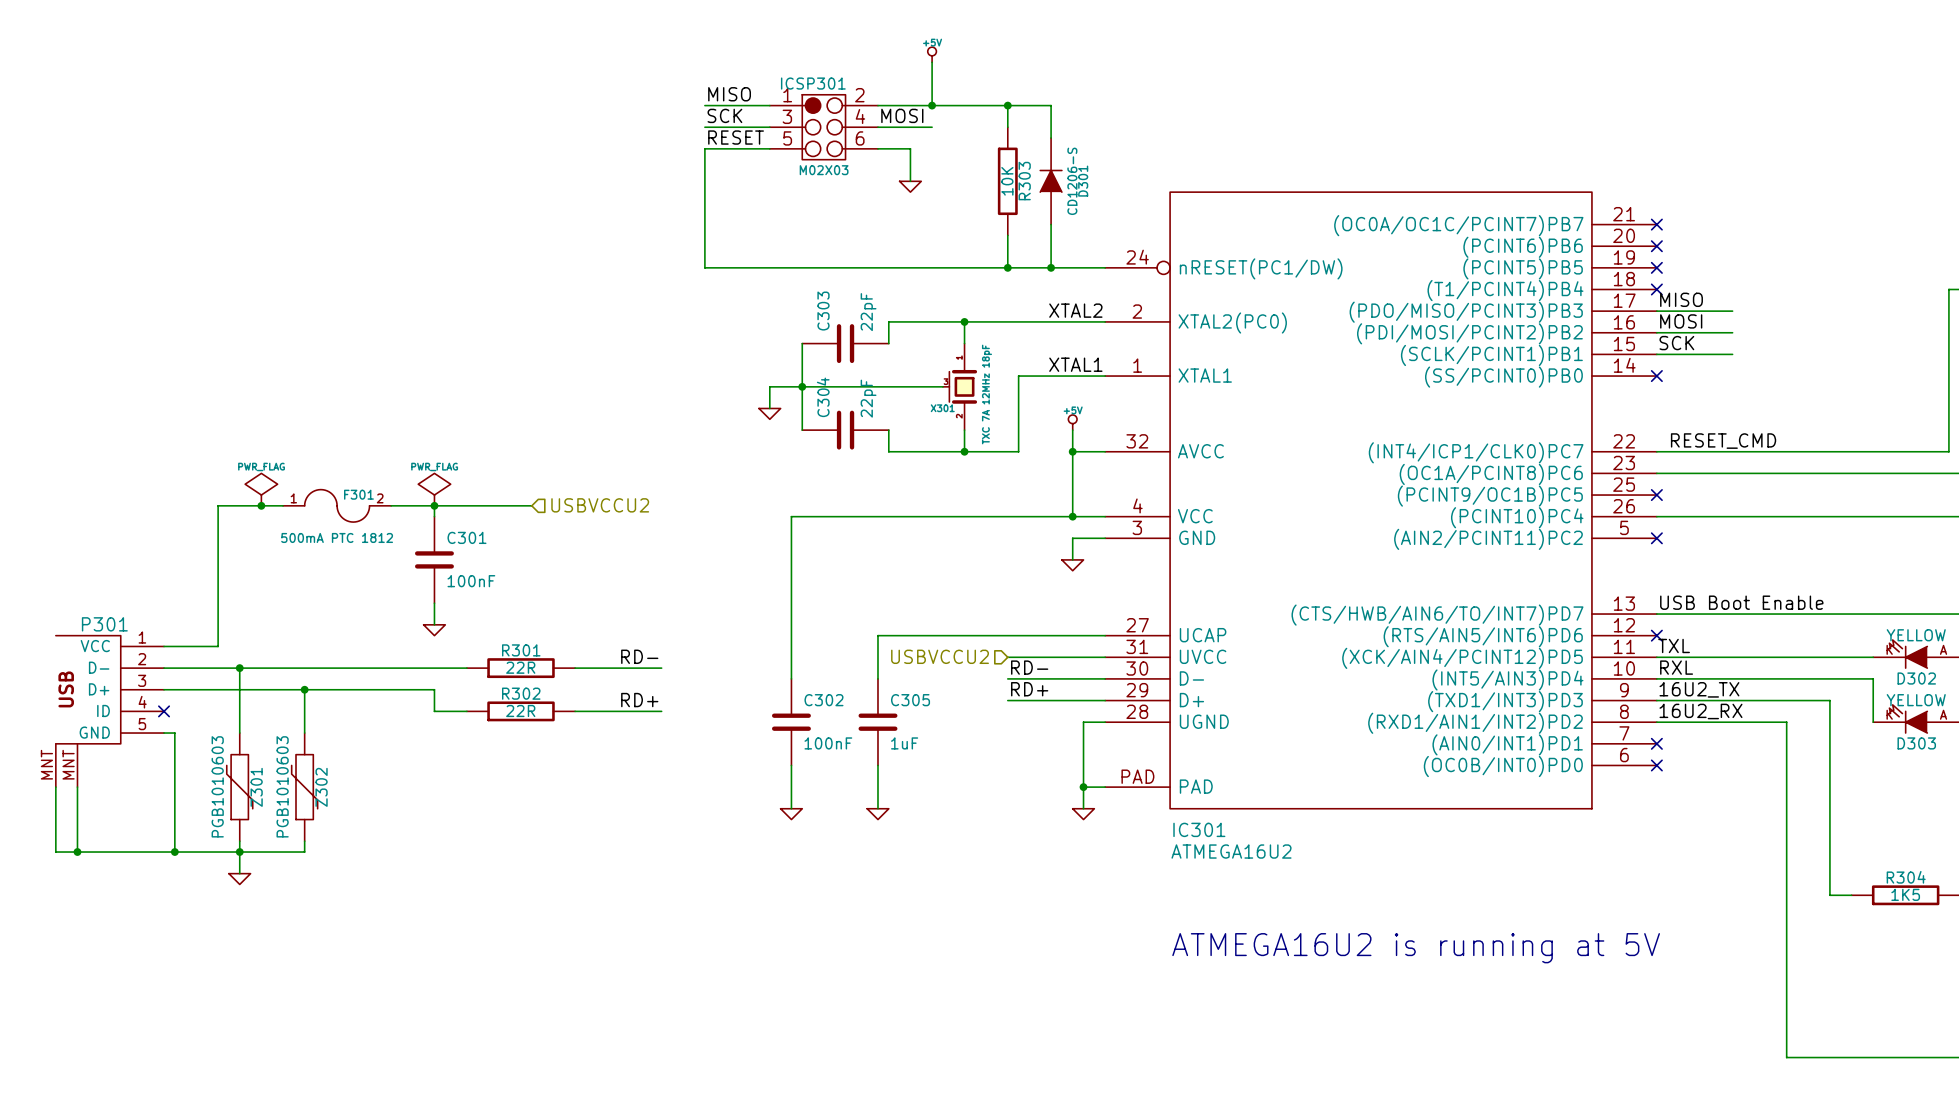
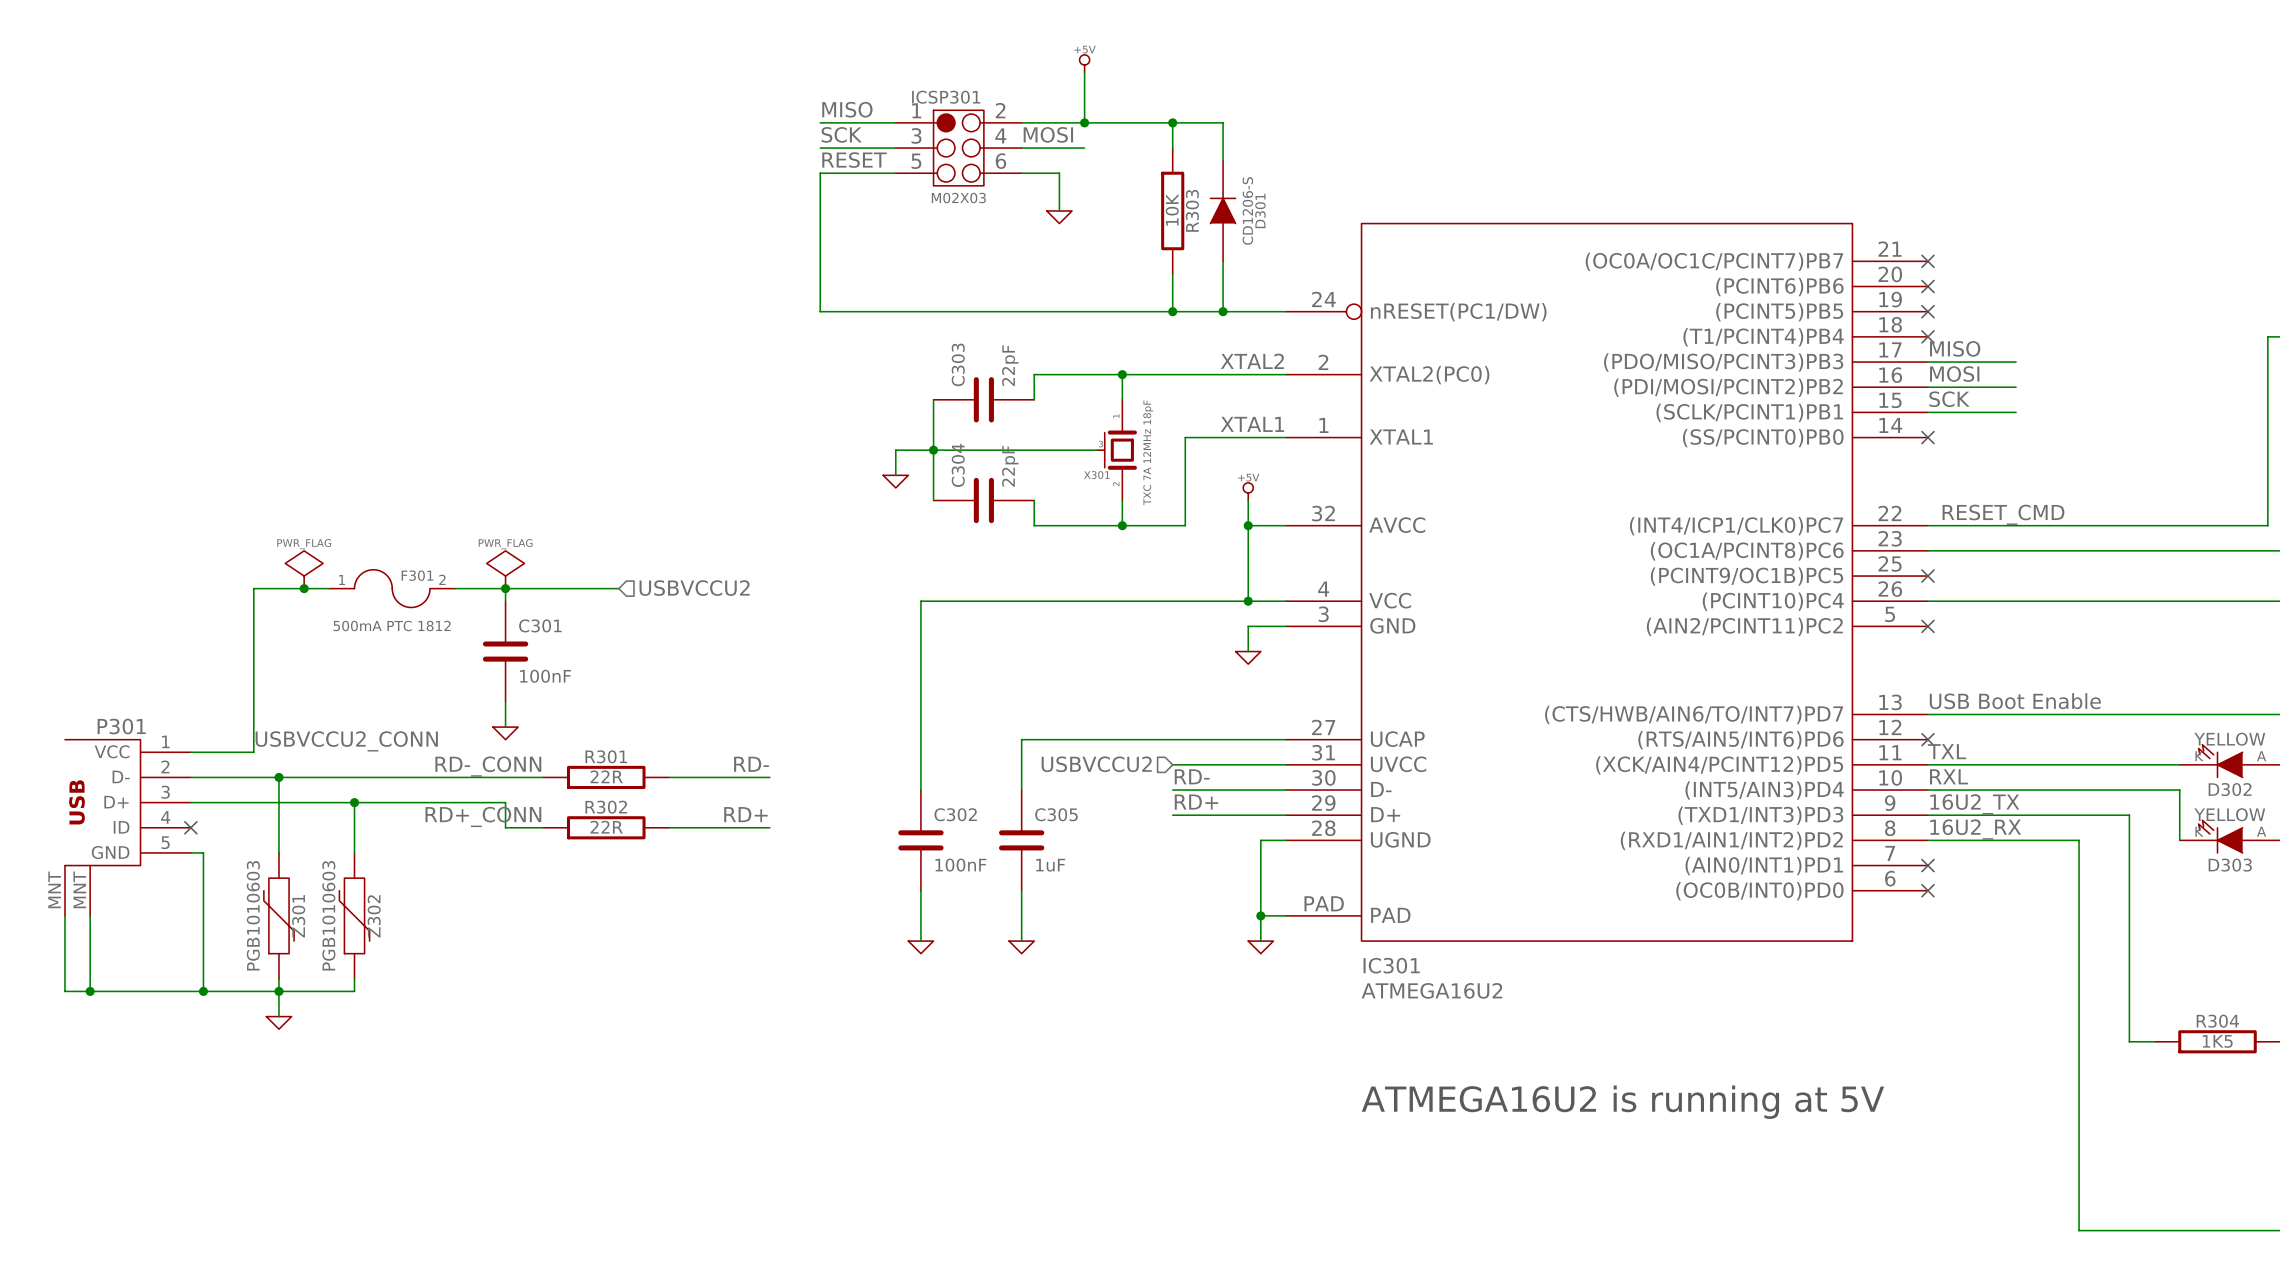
label: none -> USBVCCU2_CONN (346, 741)
label: none -> RD-_CONN (488, 766)
label: none -> RD+_CONN (483, 816)

